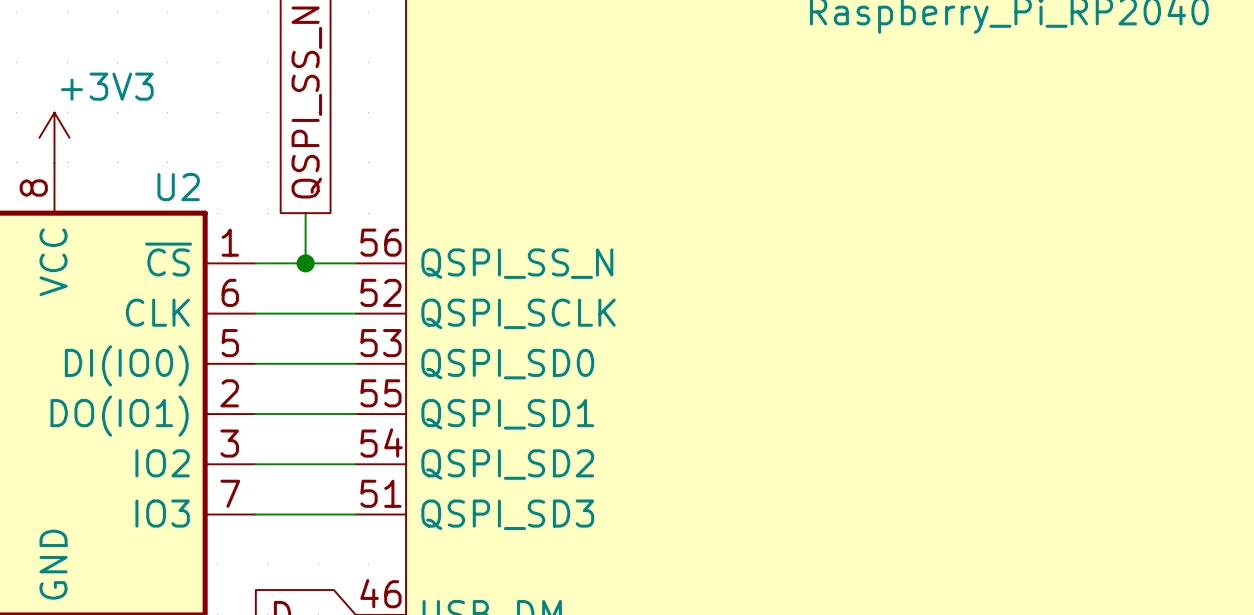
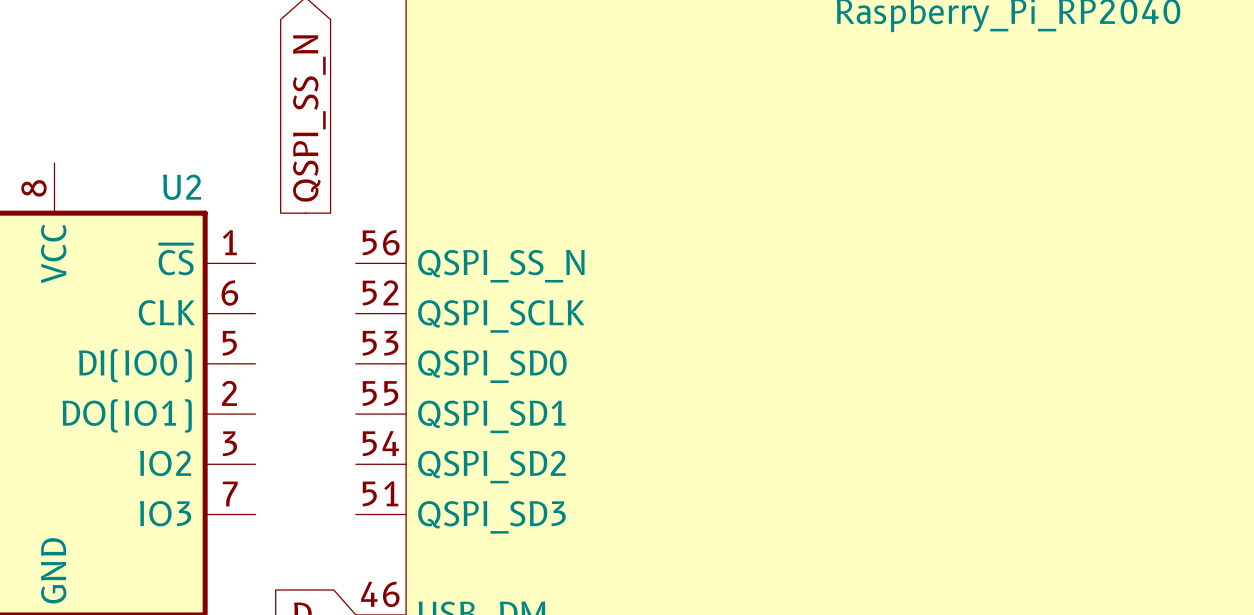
power symbol: +3V3 (54, 137) -> none
wire: (305, 213) (305, 263) -> none
wire: (255, 263) (355, 263) -> none
junction: (305, 263) -> none
wire: (255, 313) (355, 313) -> none
wire: (255, 363) (355, 363) -> none
wire: (255, 414) (355, 414) -> none
wire: (255, 464) (355, 464) -> none
wire: (255, 514) (355, 514) -> none

